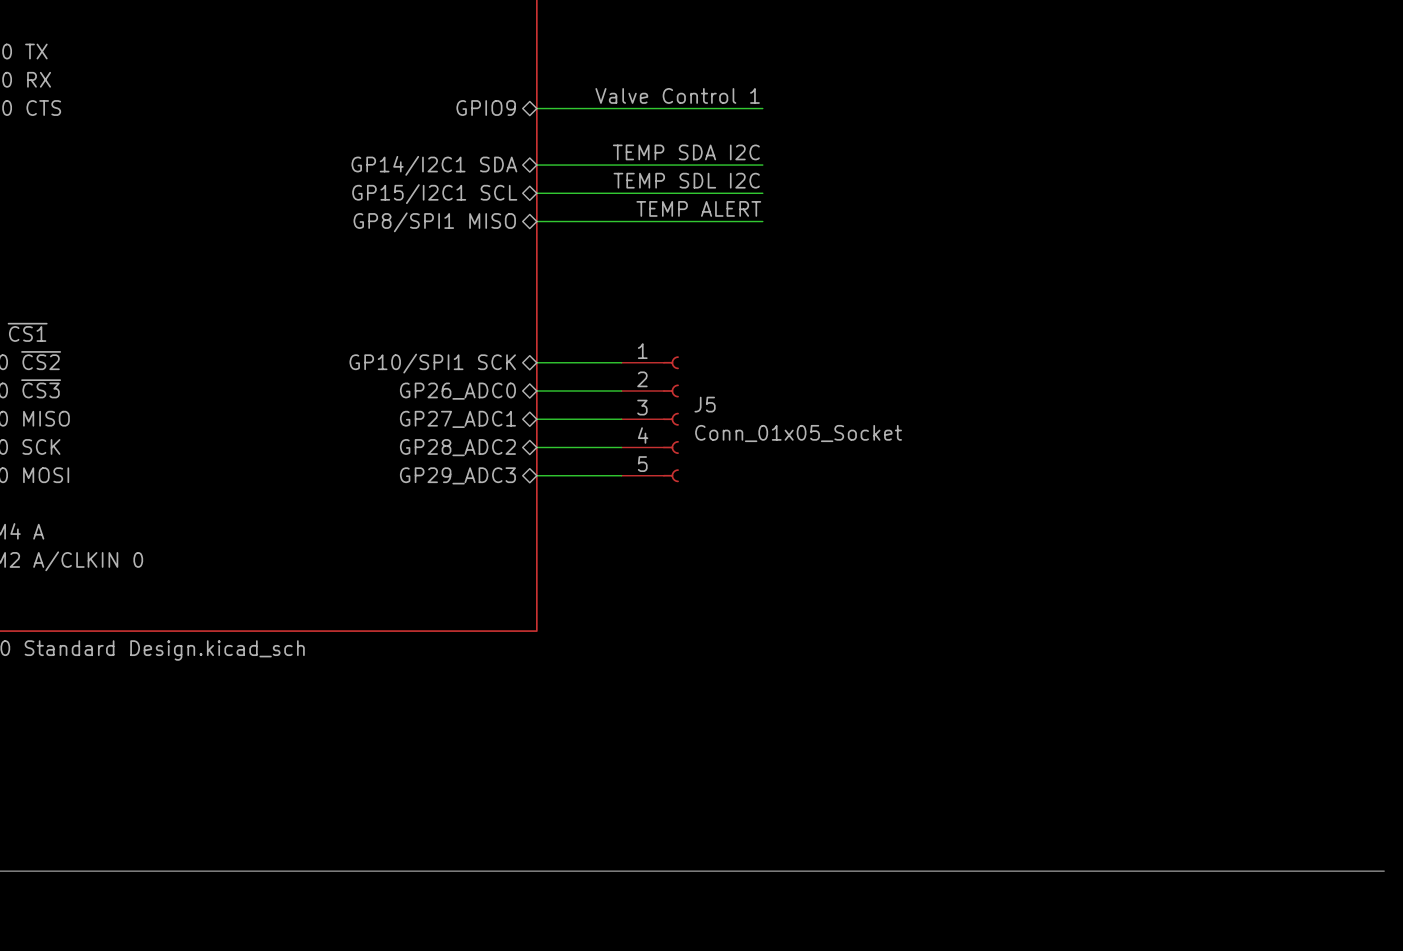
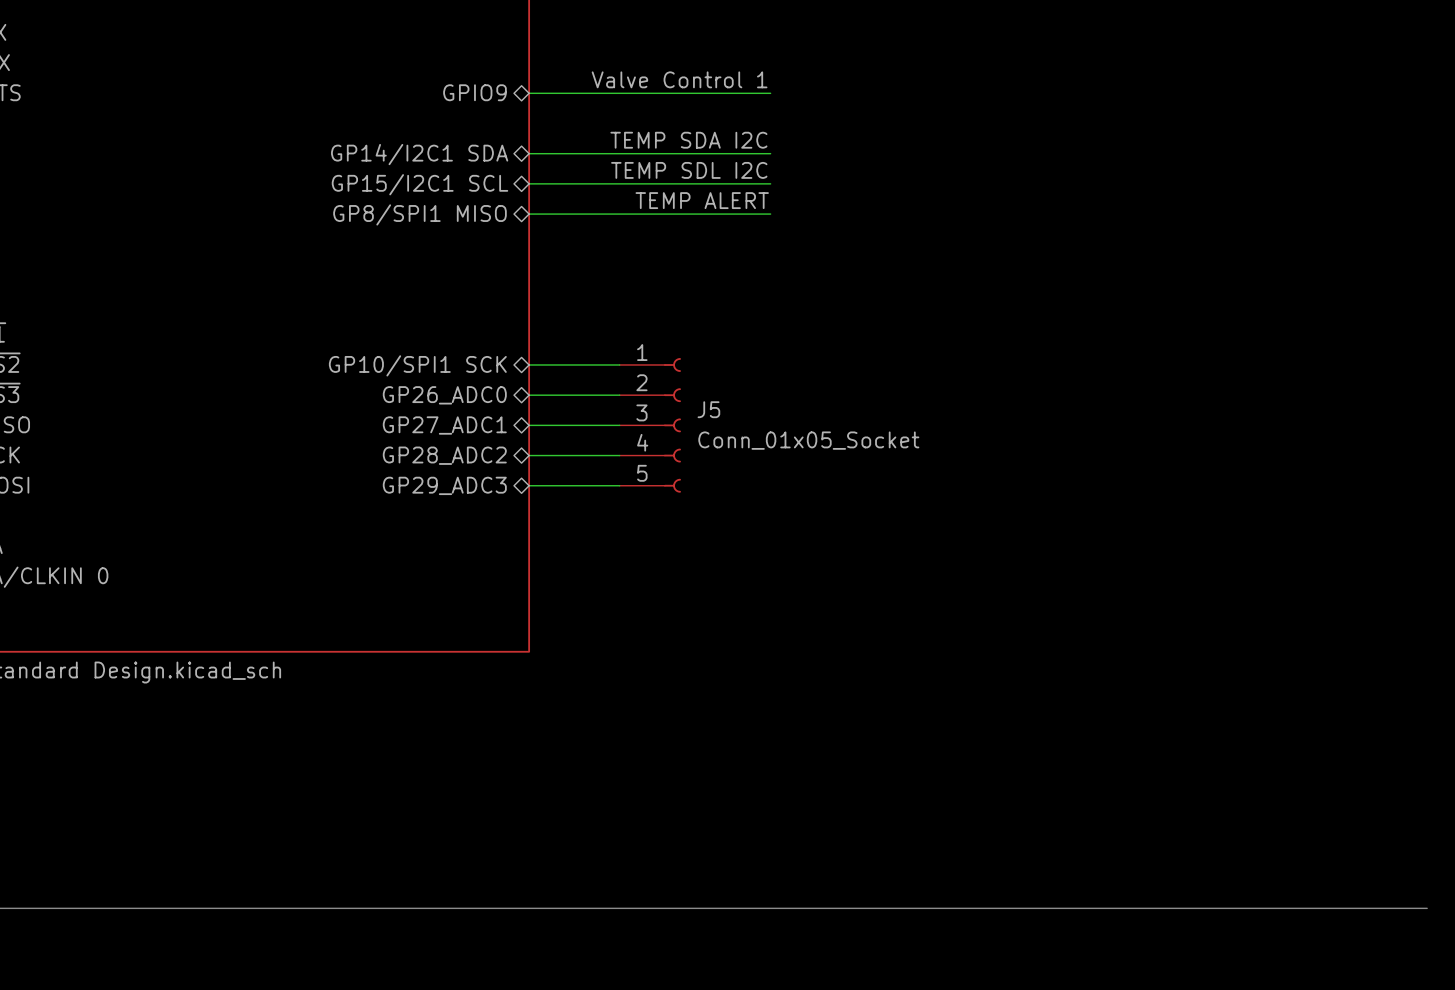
line: (1377, 871) (1384, 871) -> none

